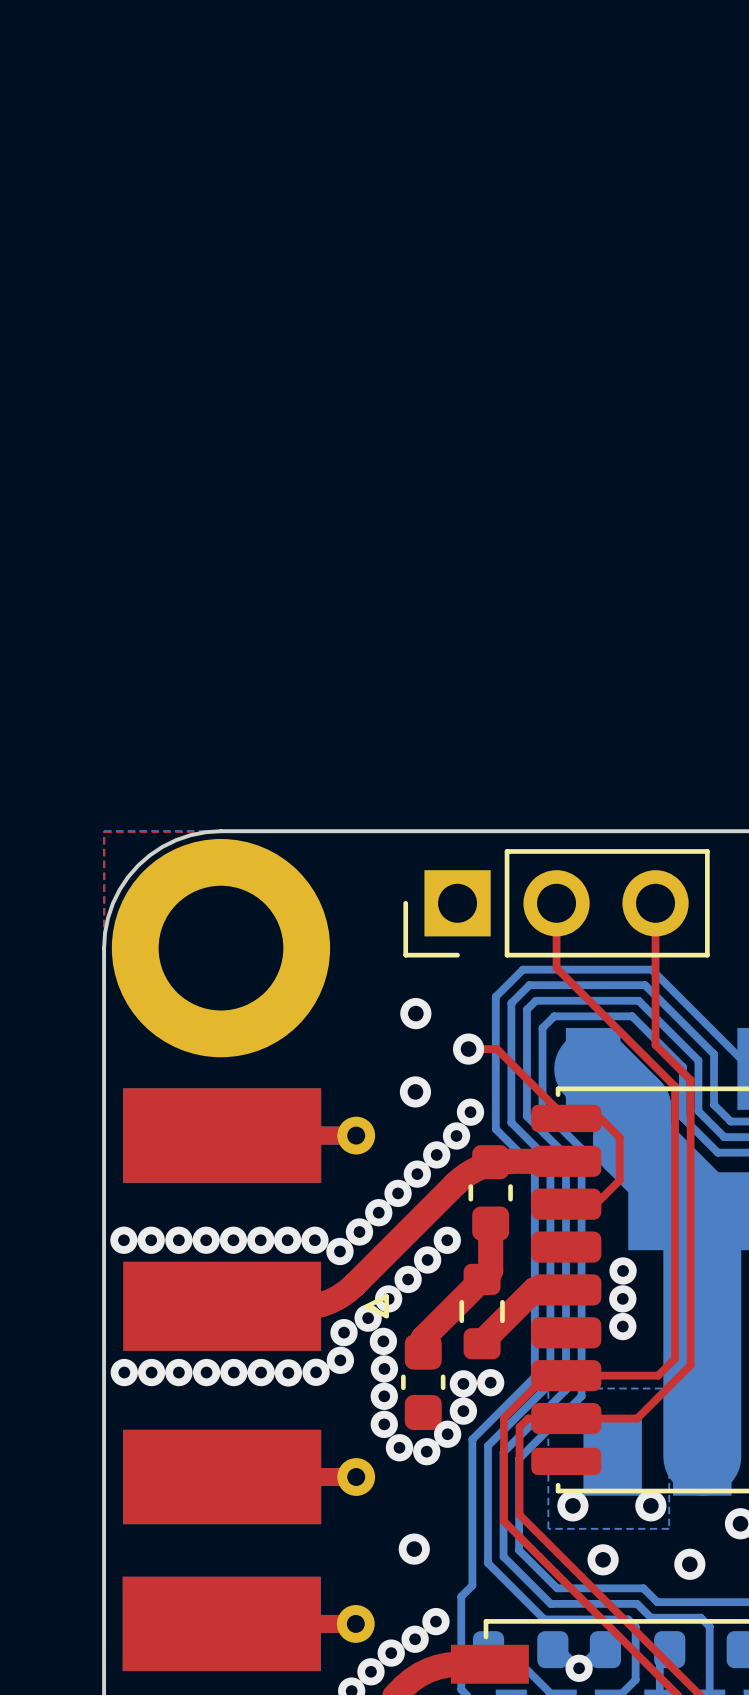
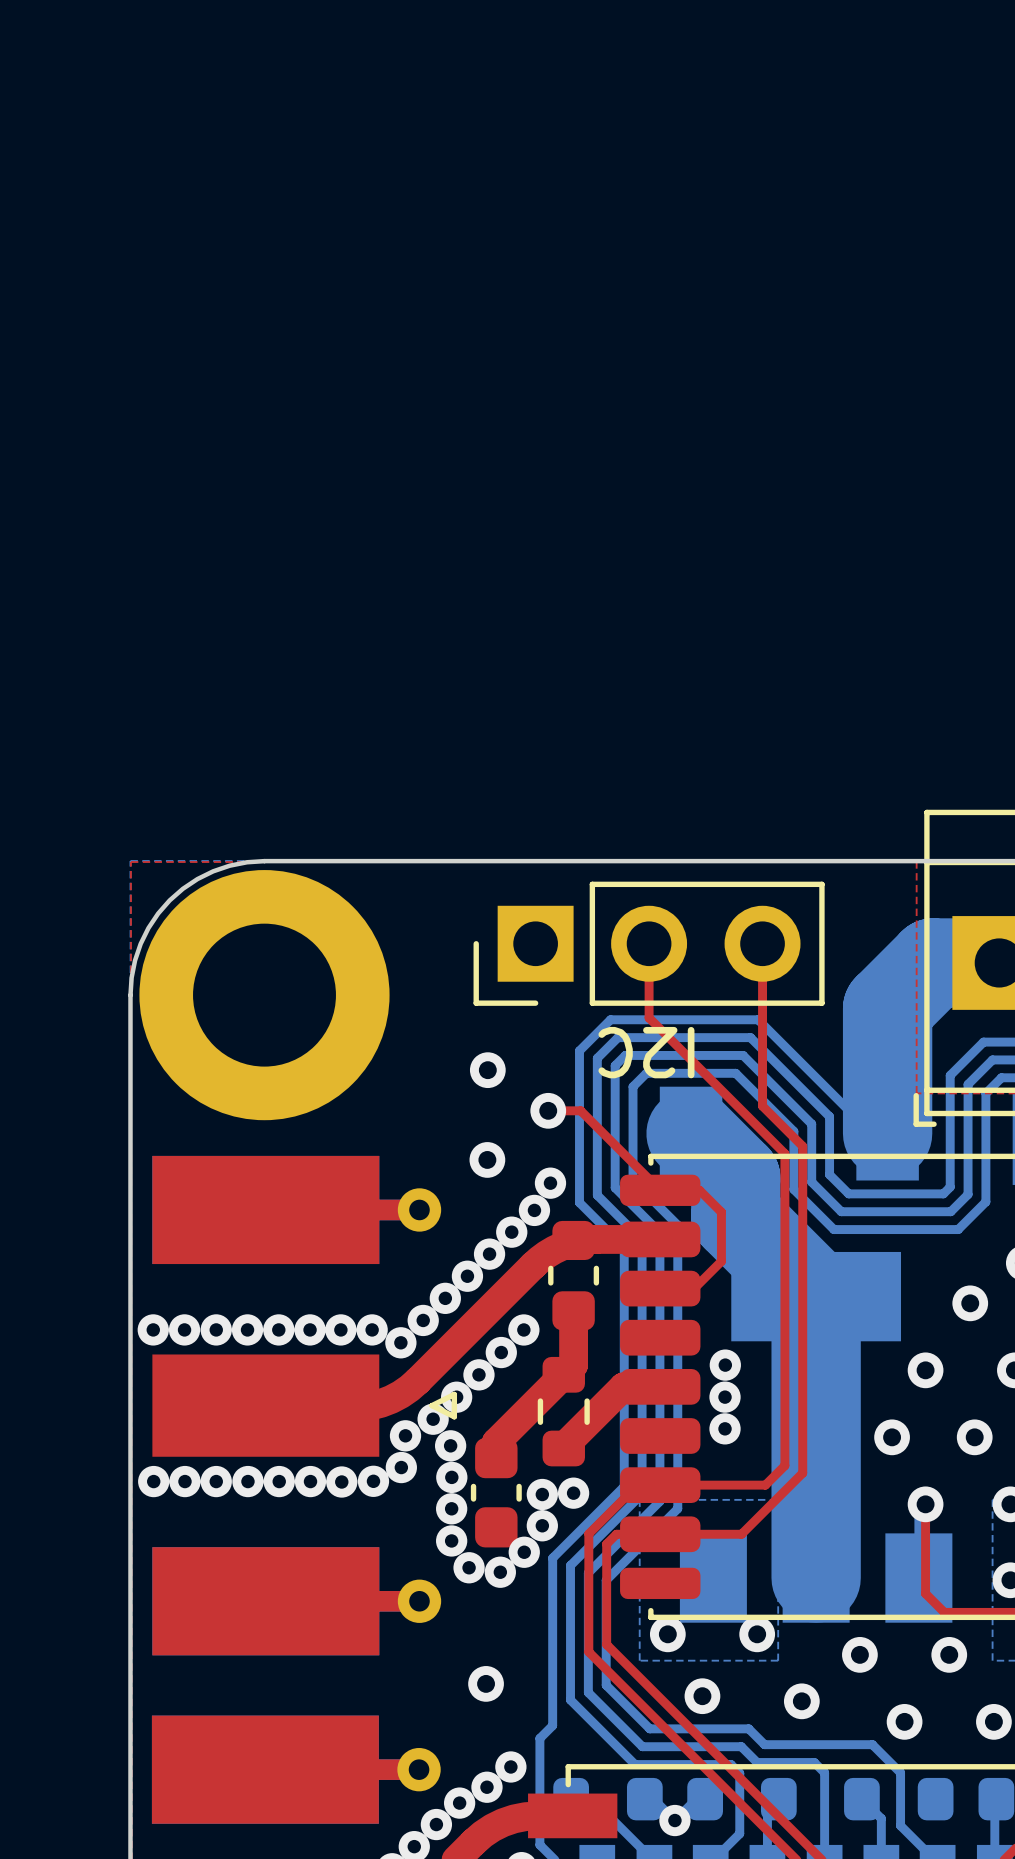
text: none -> I2C (646, 1052)

